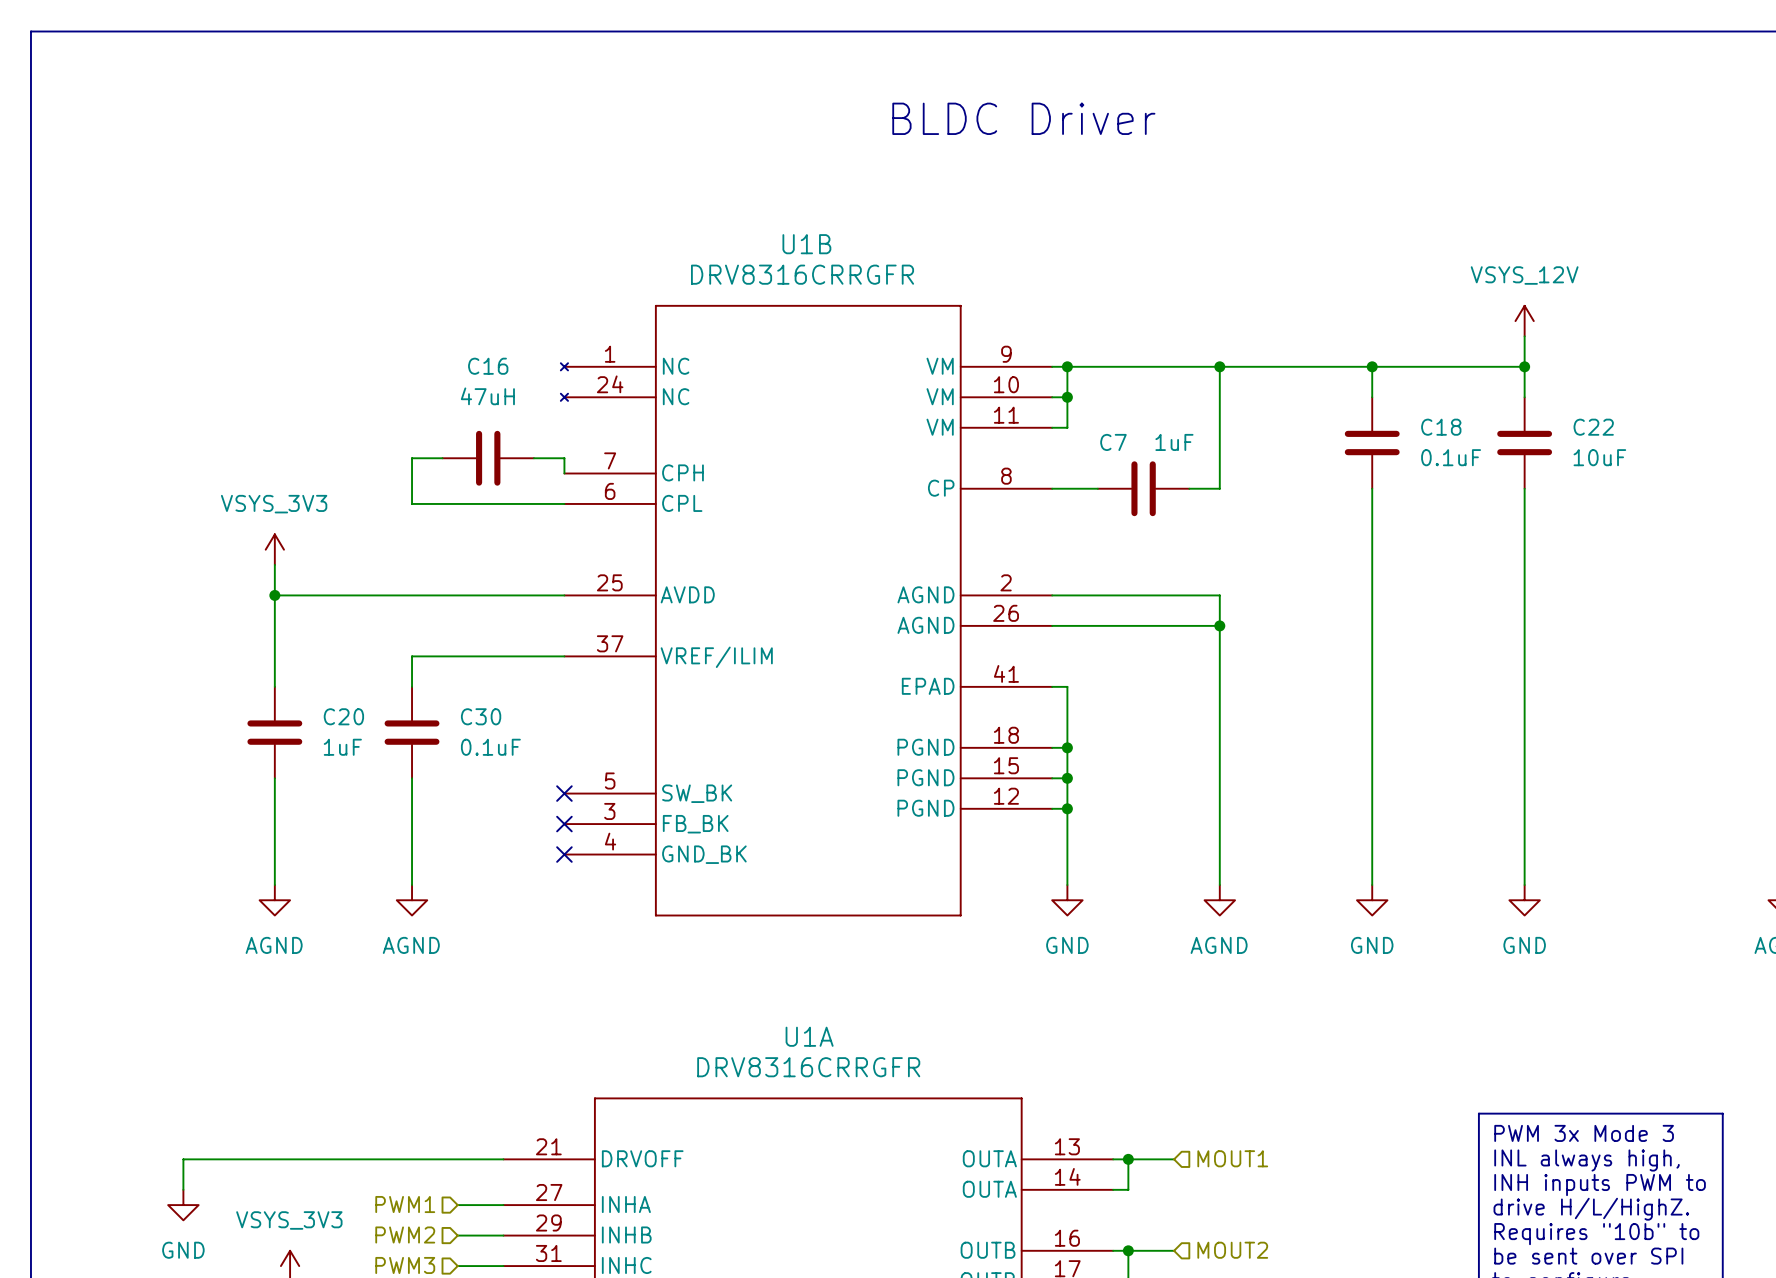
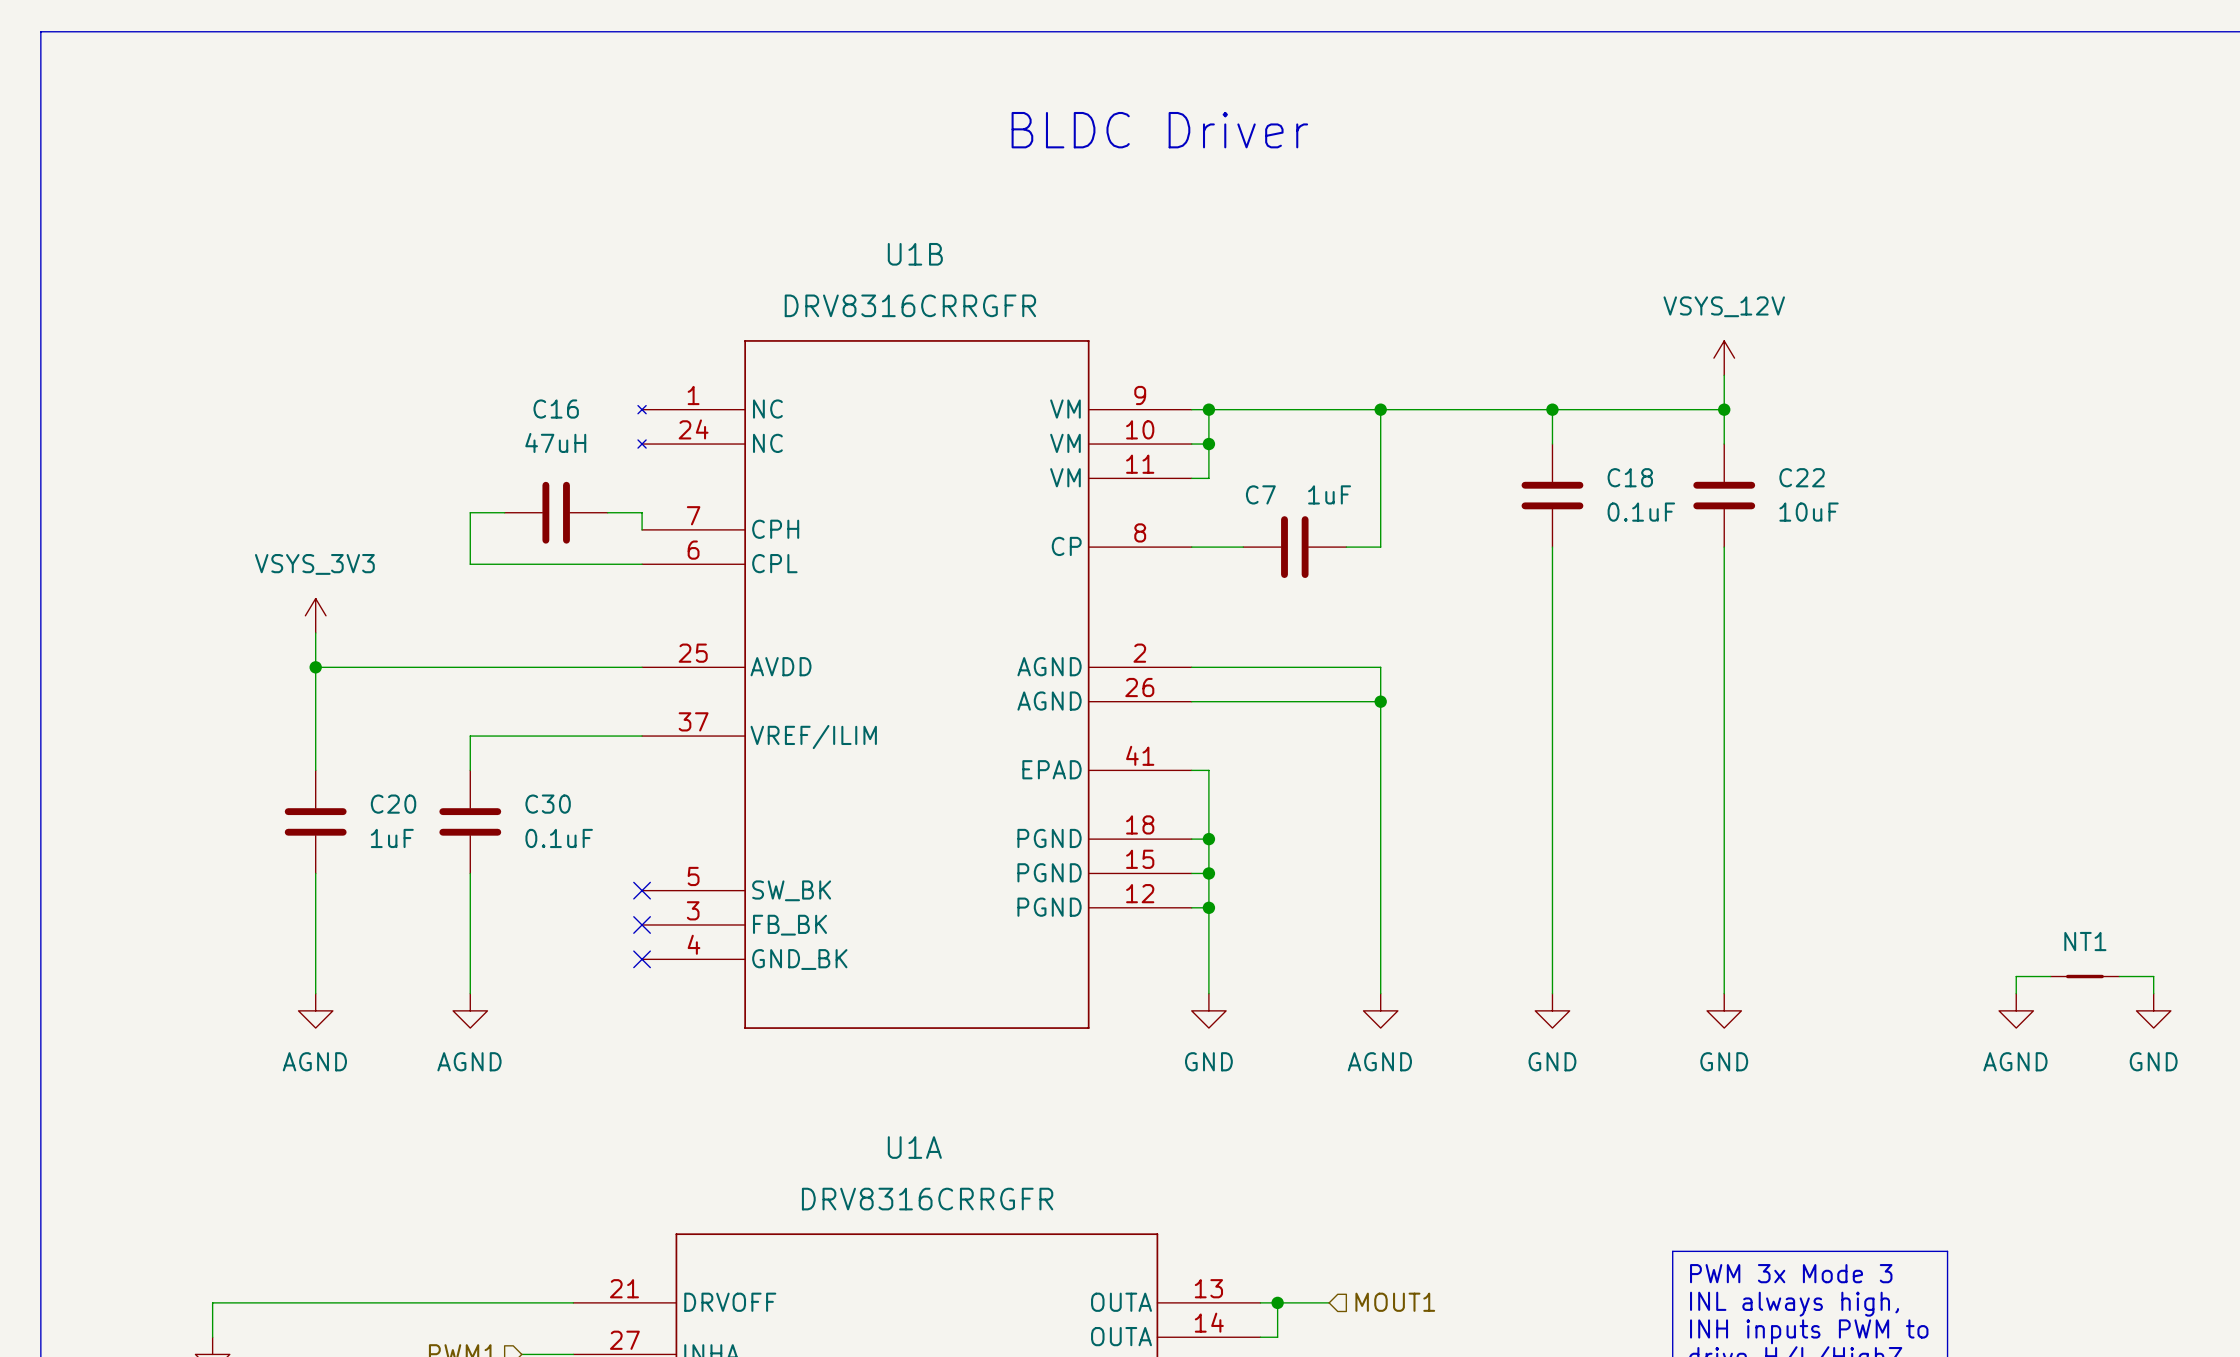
U1B name position: U1B (806, 244) -> U1B (915, 254)
U1A name position: U1A (809, 1036) -> U1A (914, 1147)
U1A value position: DRV8316CRRGFR (808, 1067) -> DRV8316CRRGFR (927, 1199)

